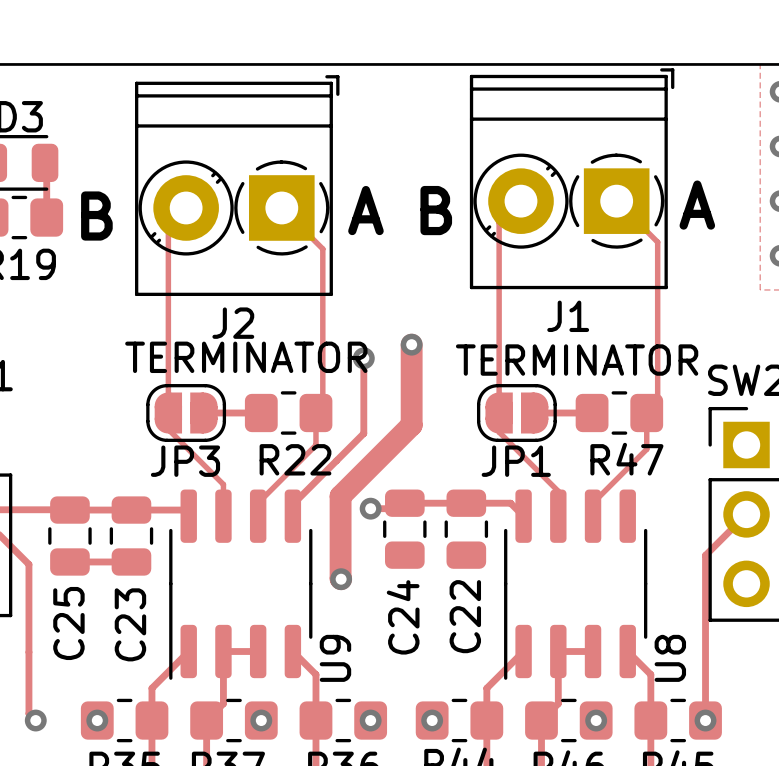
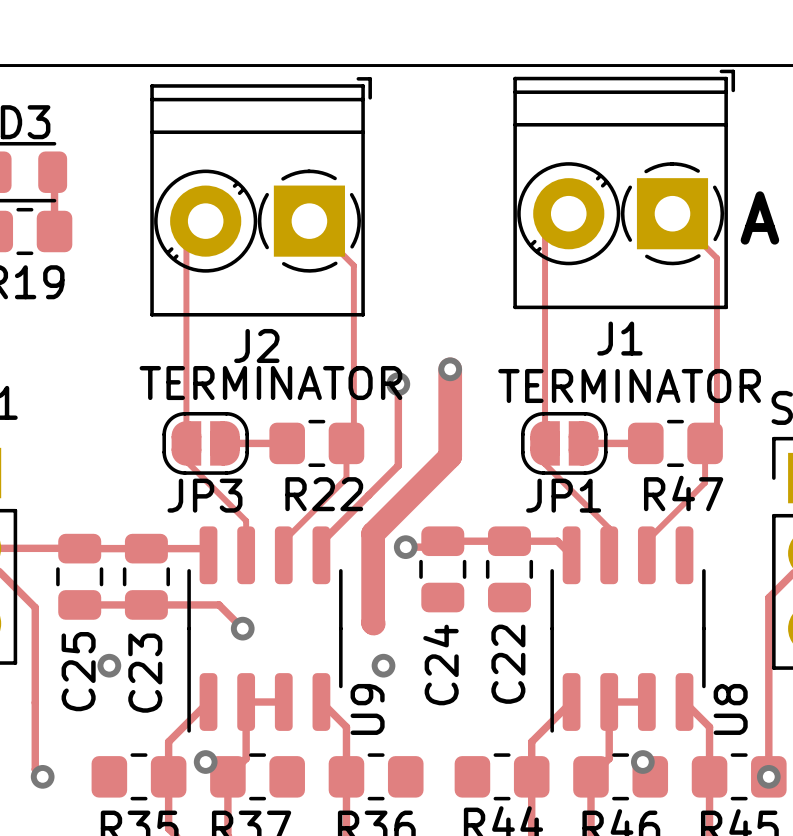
text: A B (400, 210) -> none
text: B (96, 216) -> none
track: none -> (146, 604) (219, 604) (242, 628)
via position: (341, 579) -> (383, 665)
via: none -> (242, 628)
via: none -> (109, 665)
via: none -> (205, 762)
via: (97, 720) -> none
via: (261, 720) -> none
via: (370, 720) -> none
via: (432, 720) -> none
via position: (596, 720) -> (642, 762)

